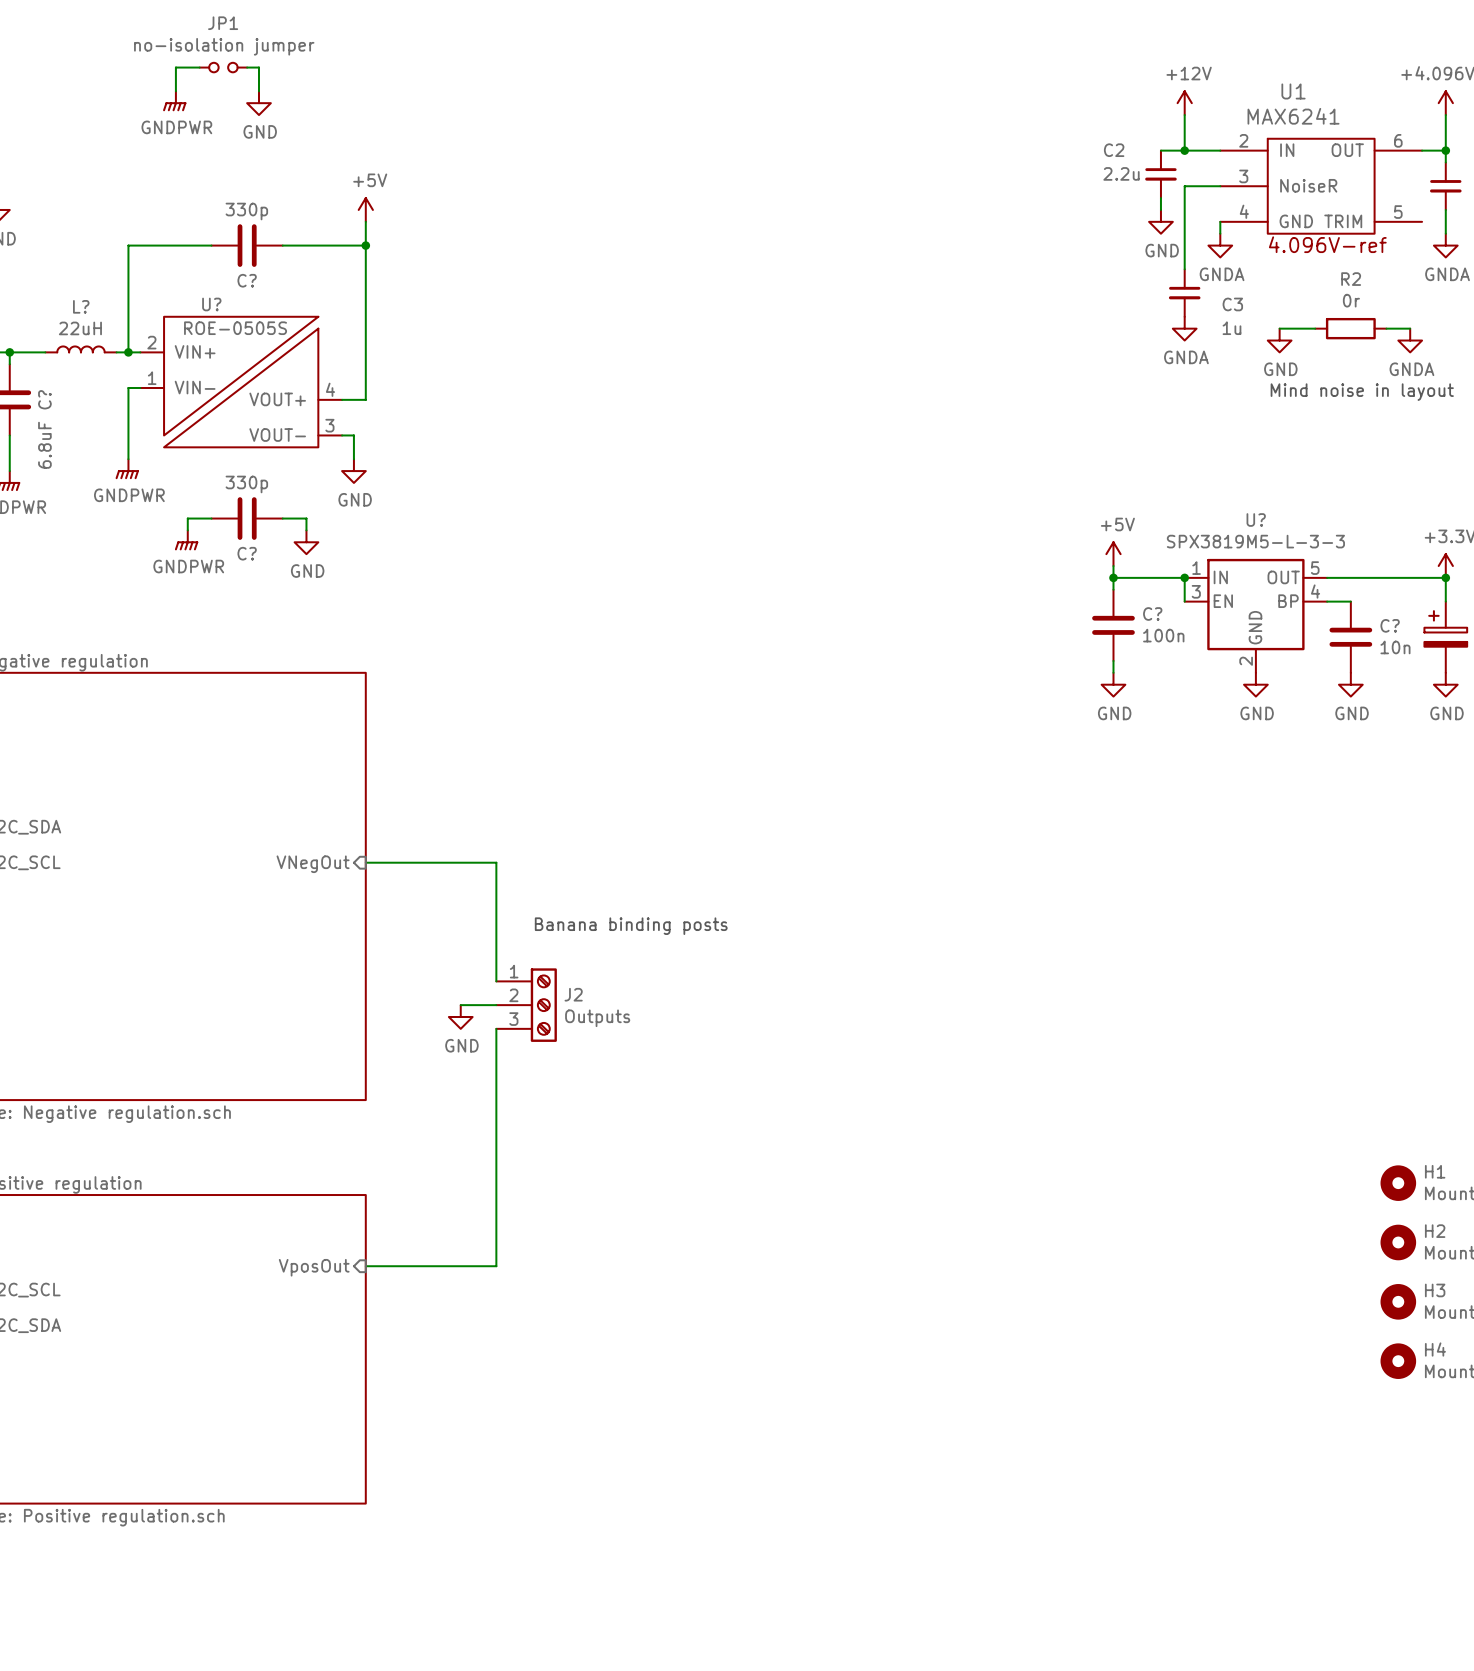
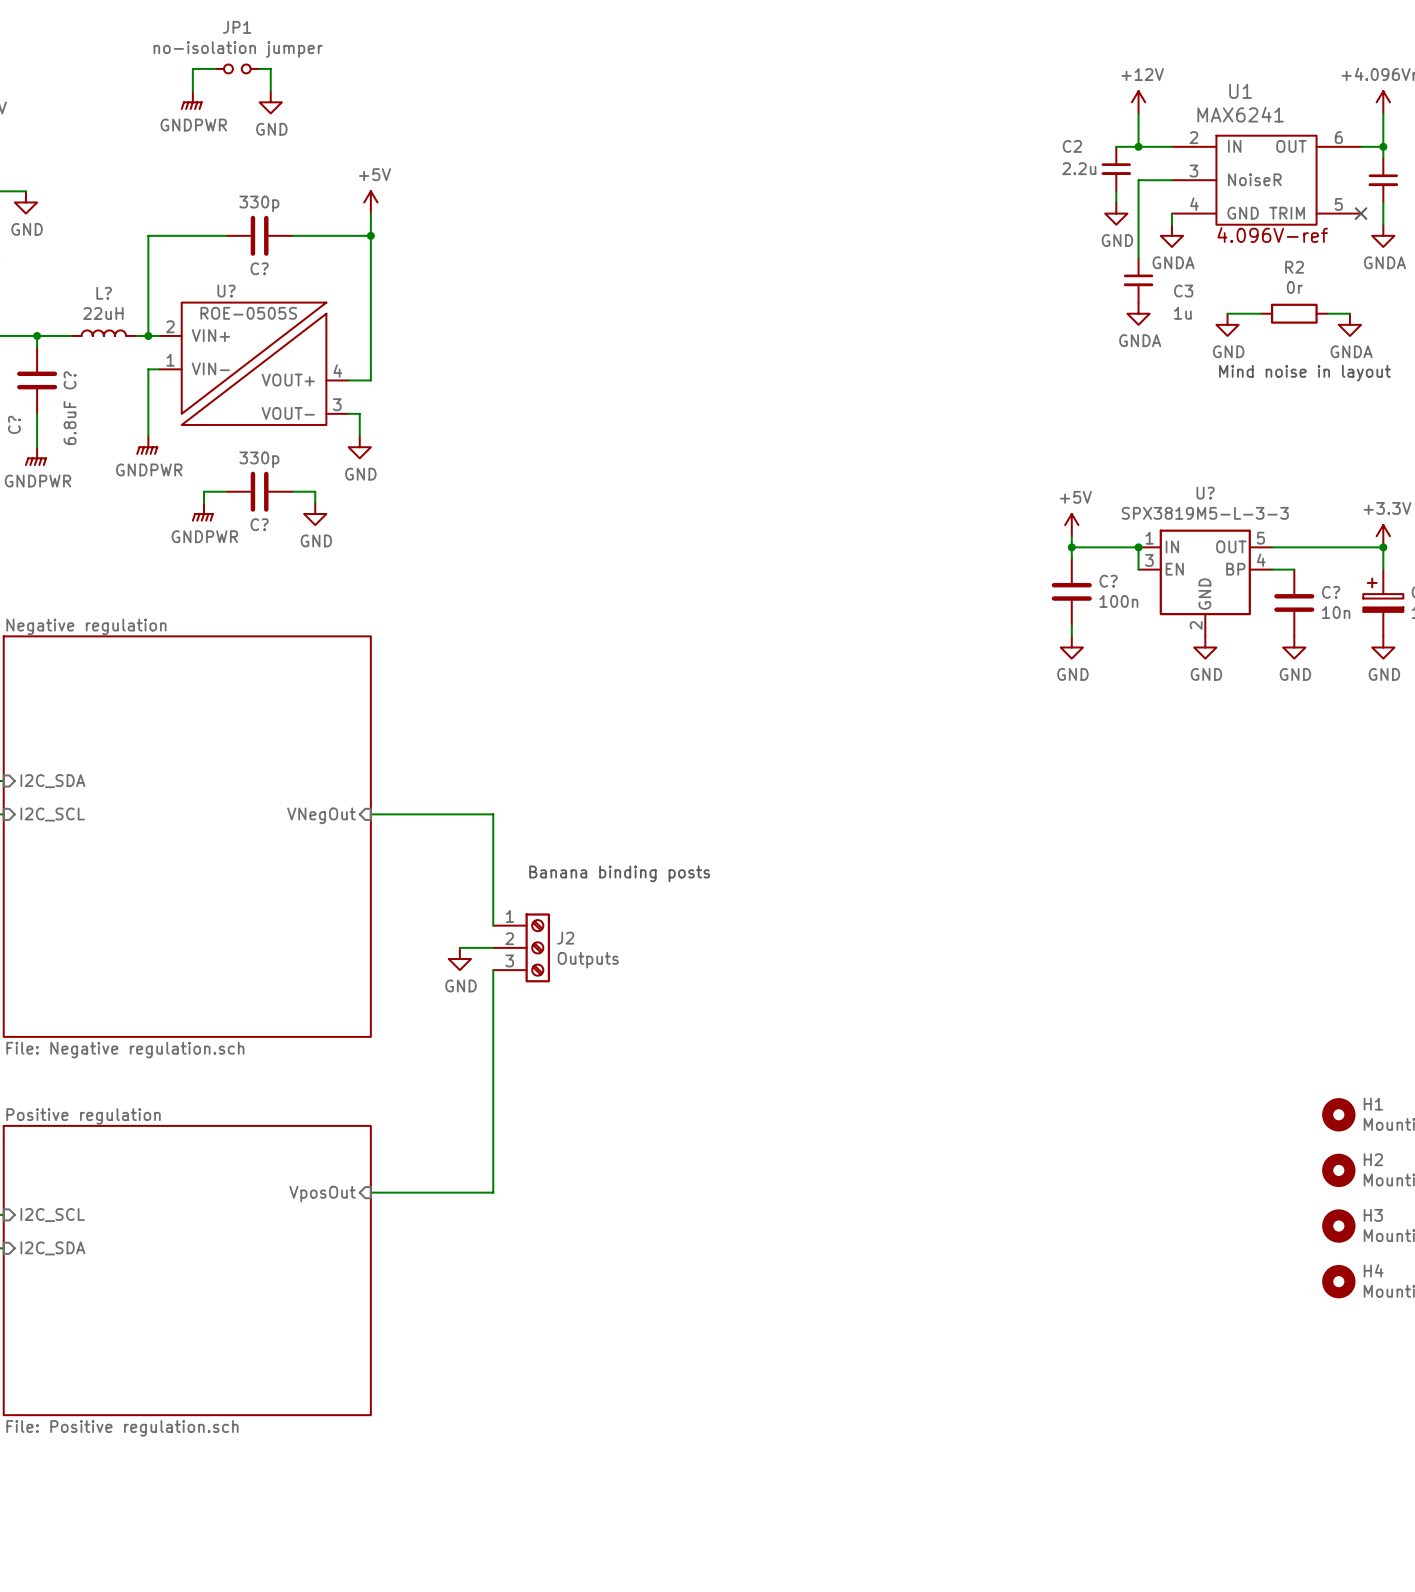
no-connect mark: none -> (1361, 213)

